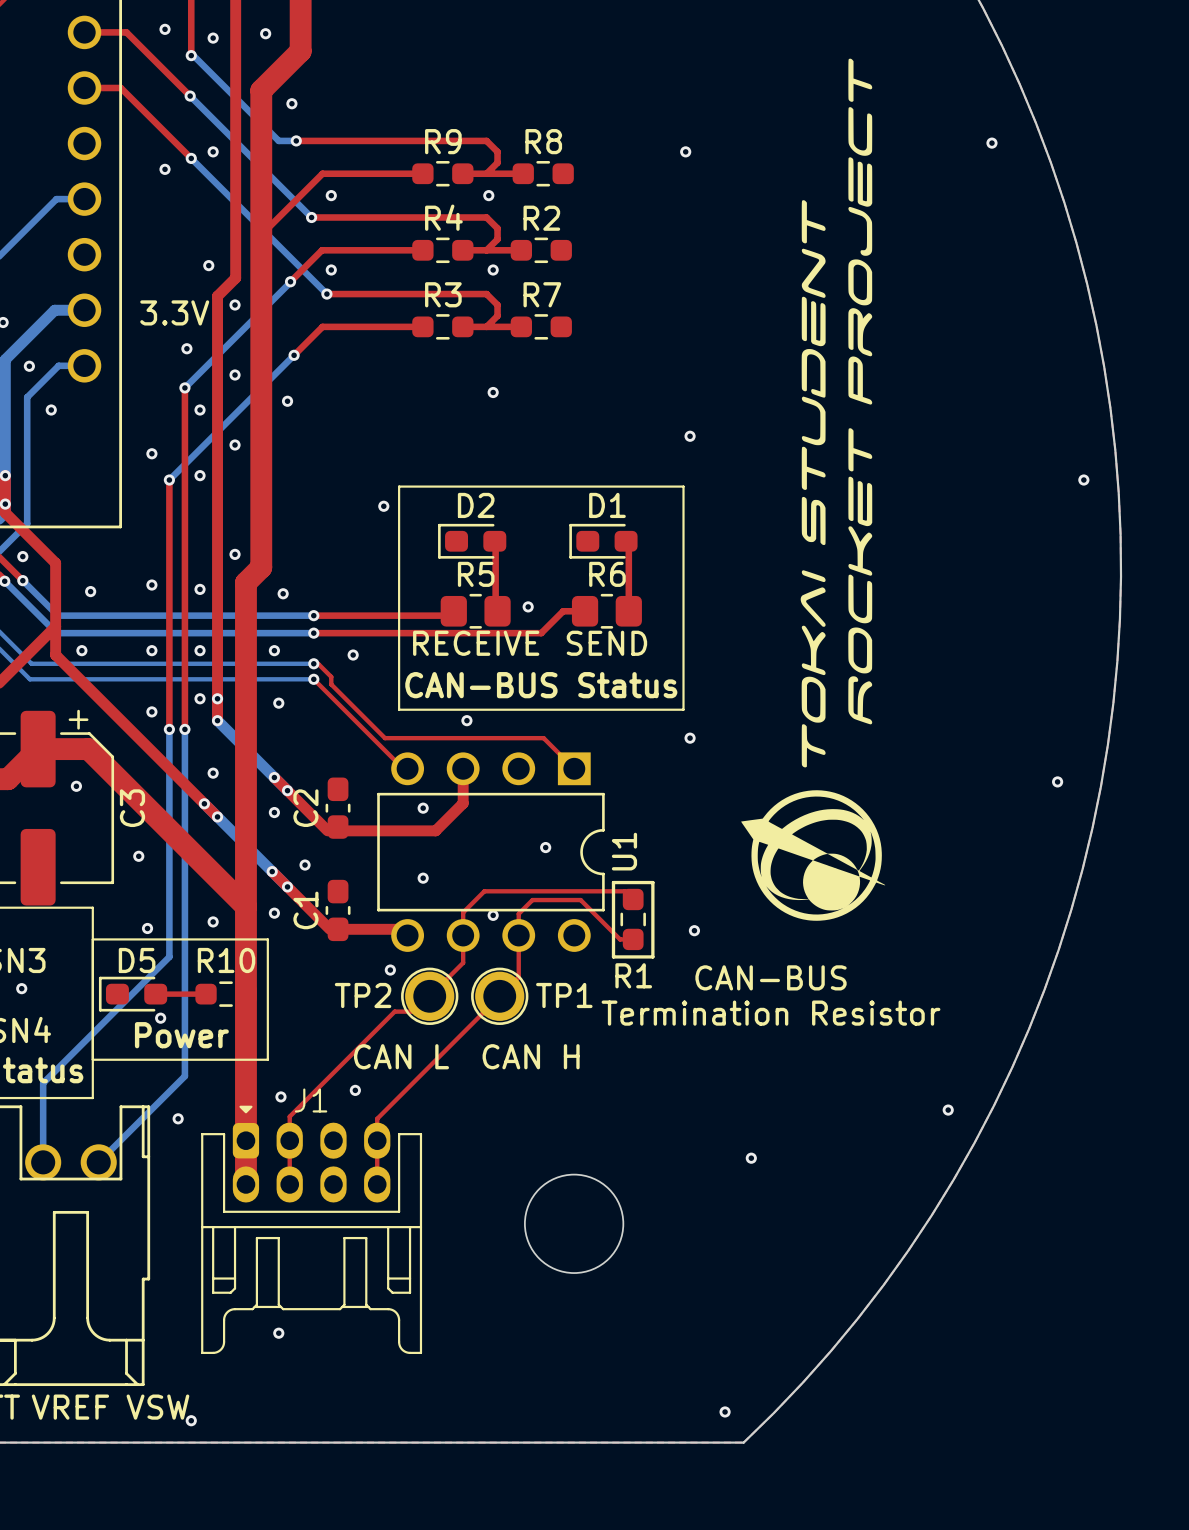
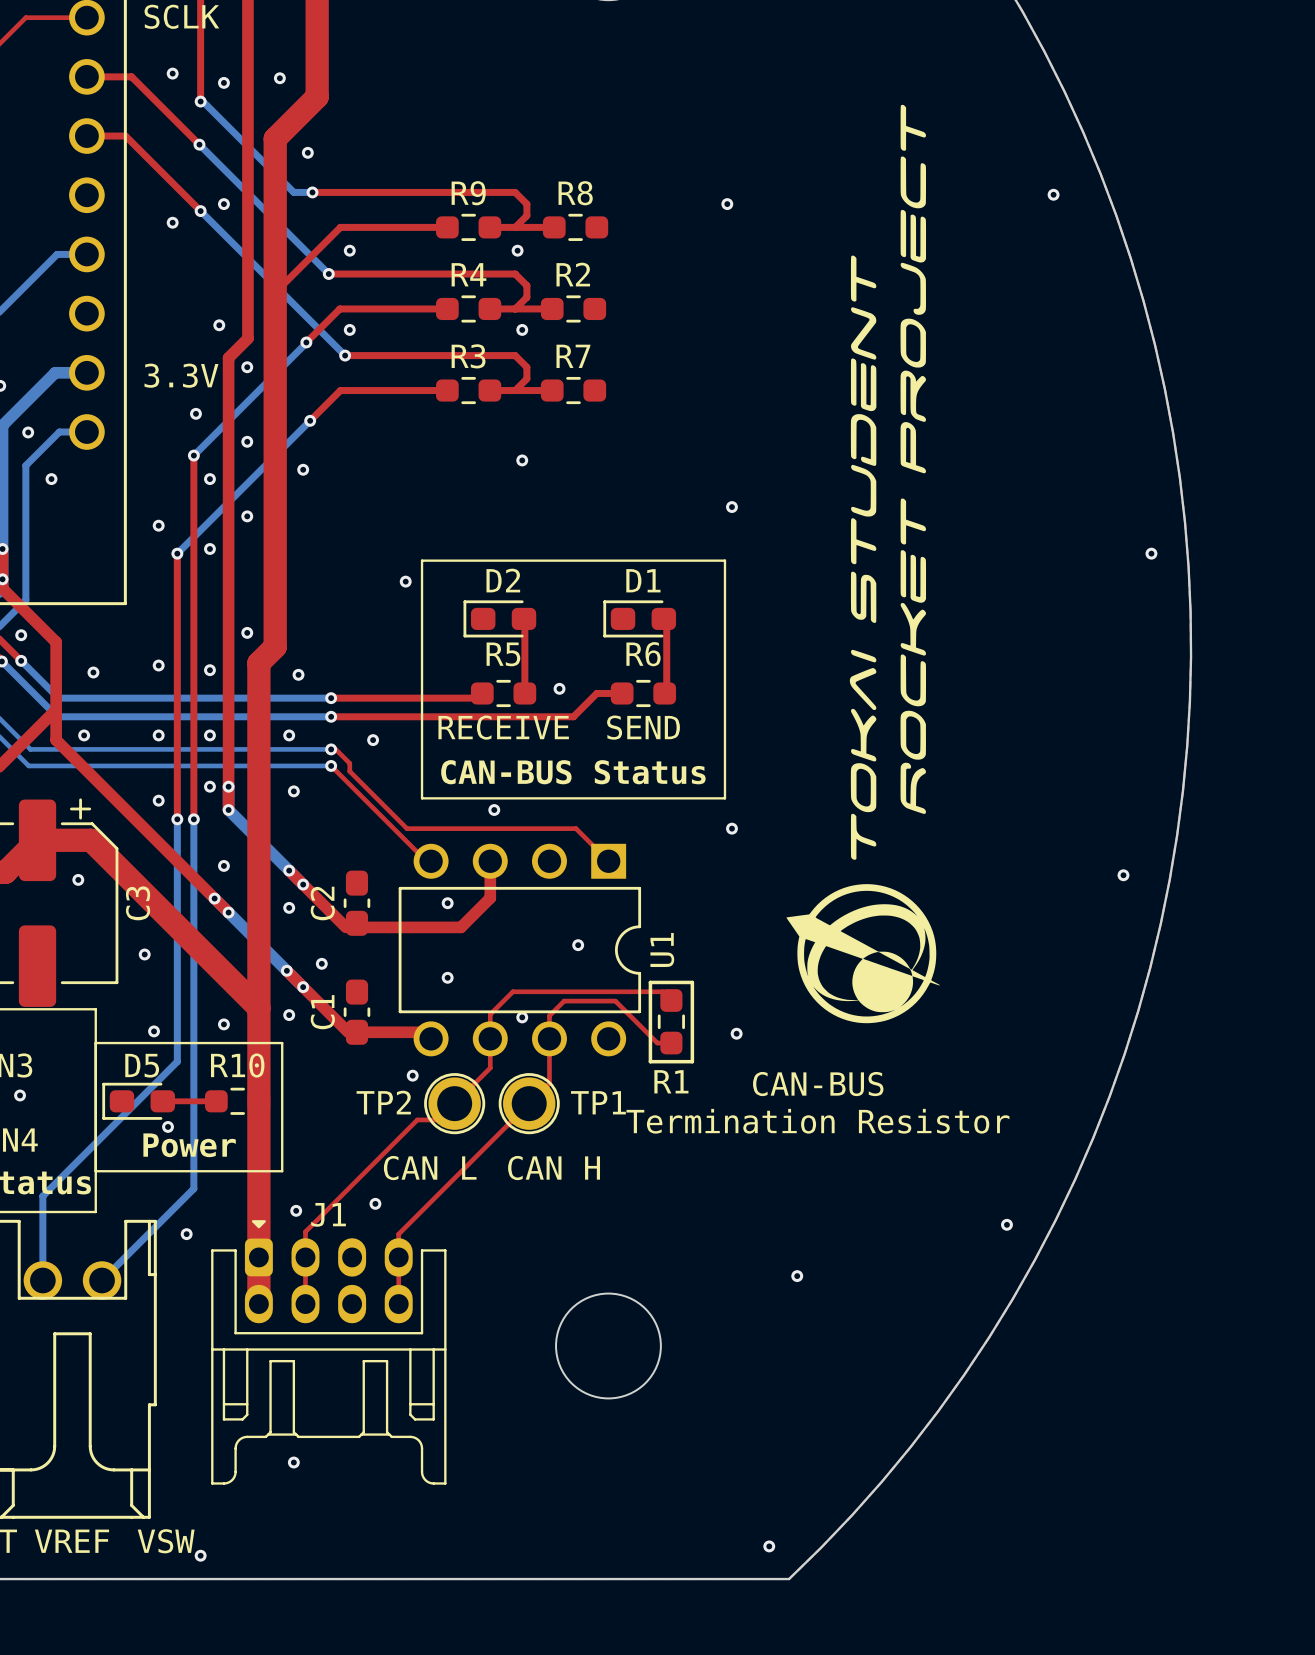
R5 footprint: [440, 593, 511, 629] -> [470, 679, 537, 708]
R6 footprint: [571, 593, 642, 629] -> [610, 679, 677, 708]

